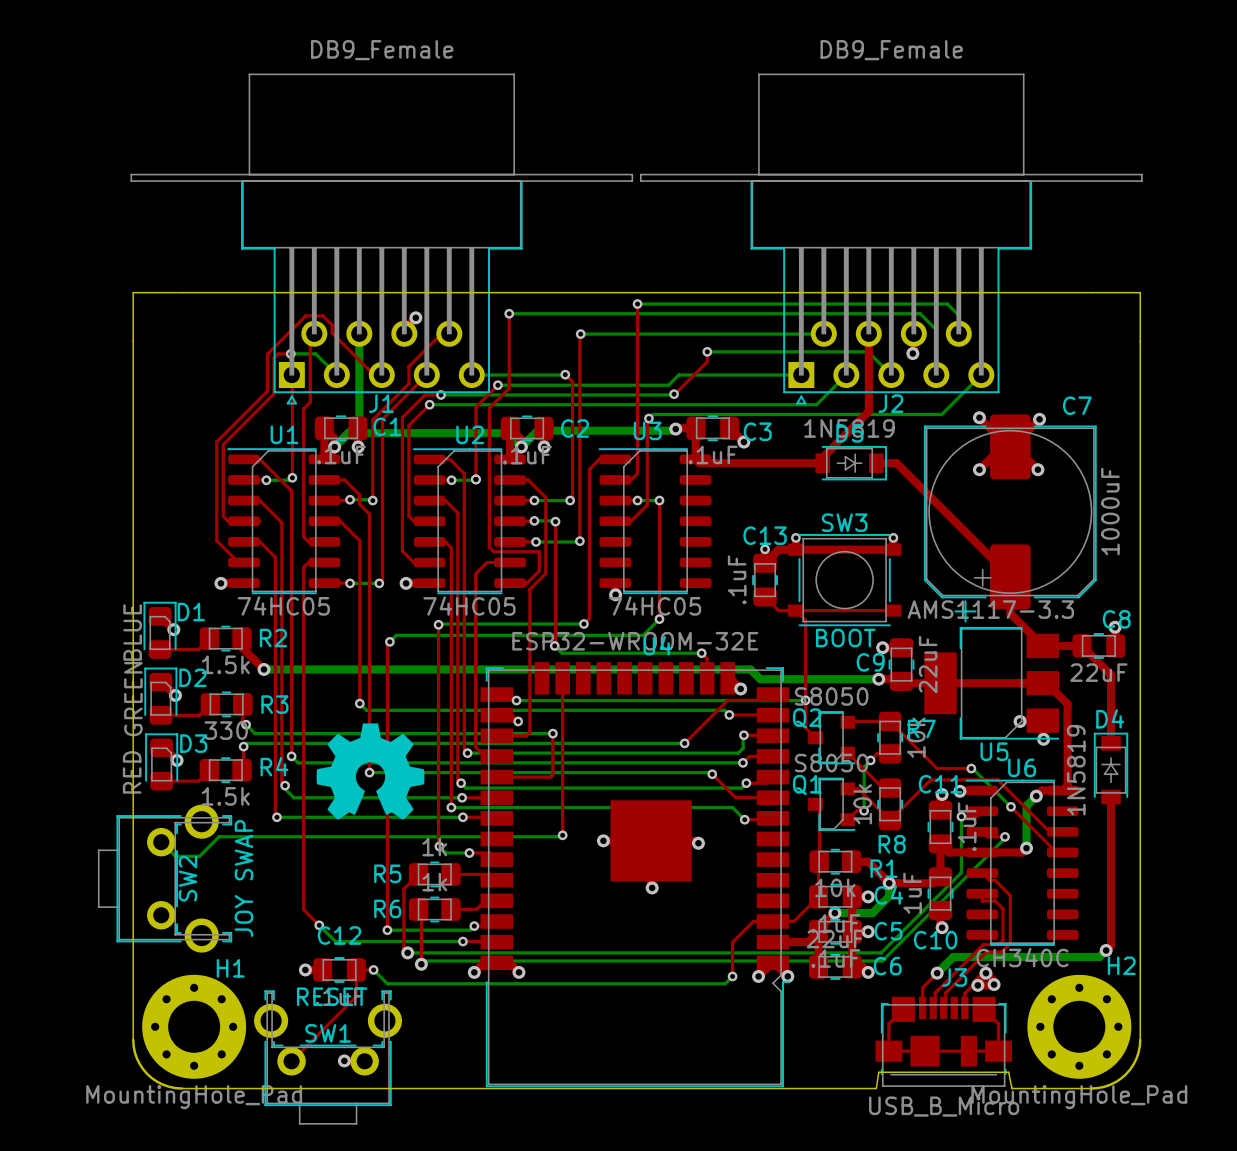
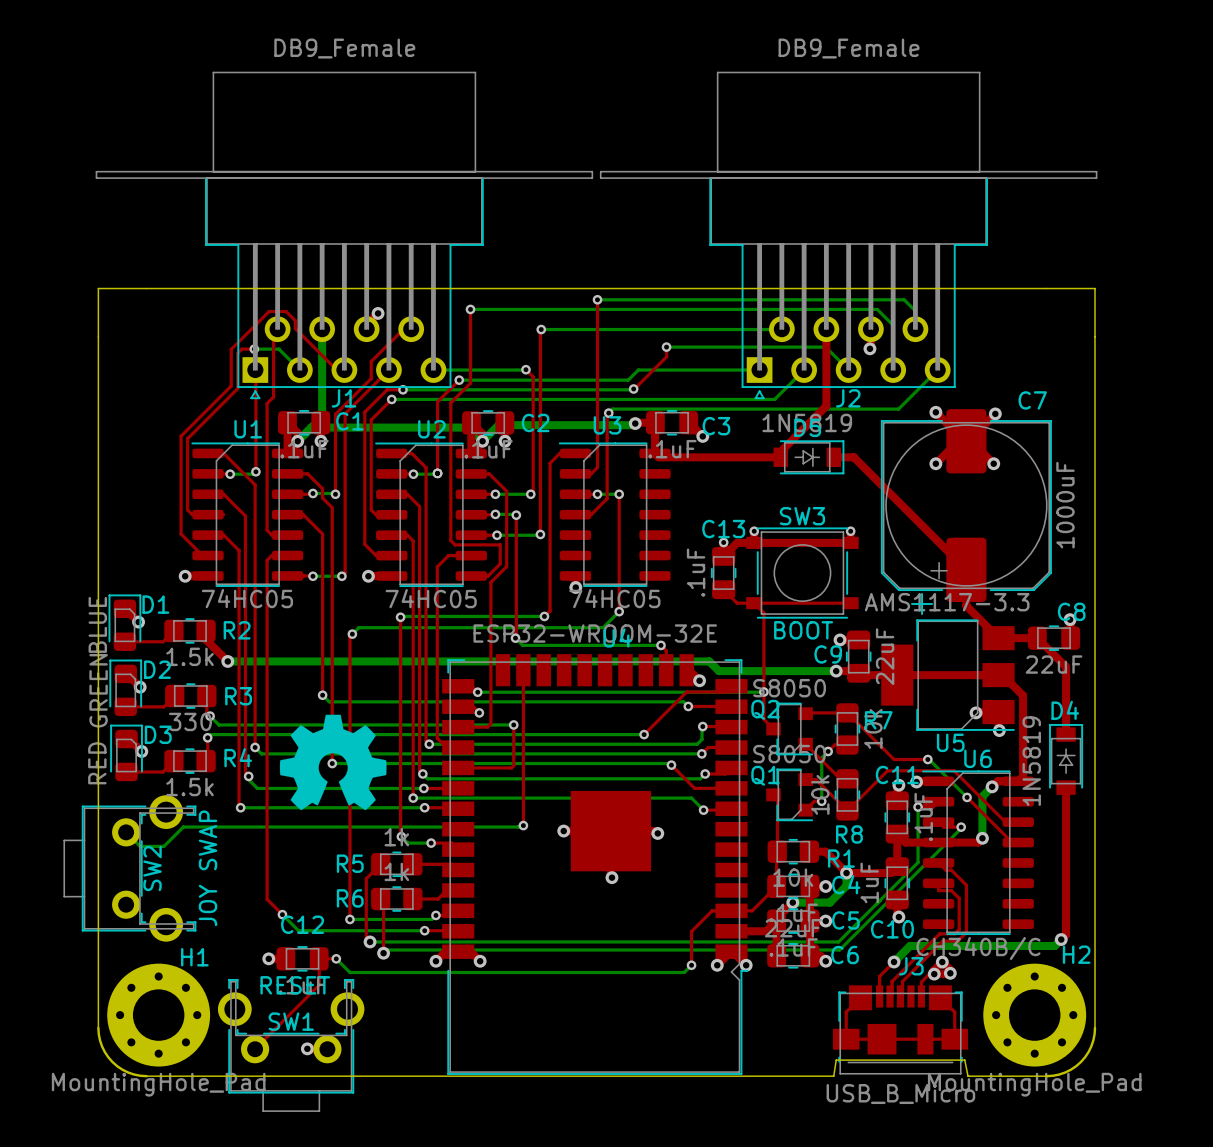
U6 value: CH340C (1022, 957) -> CH340B/C (978, 948)

